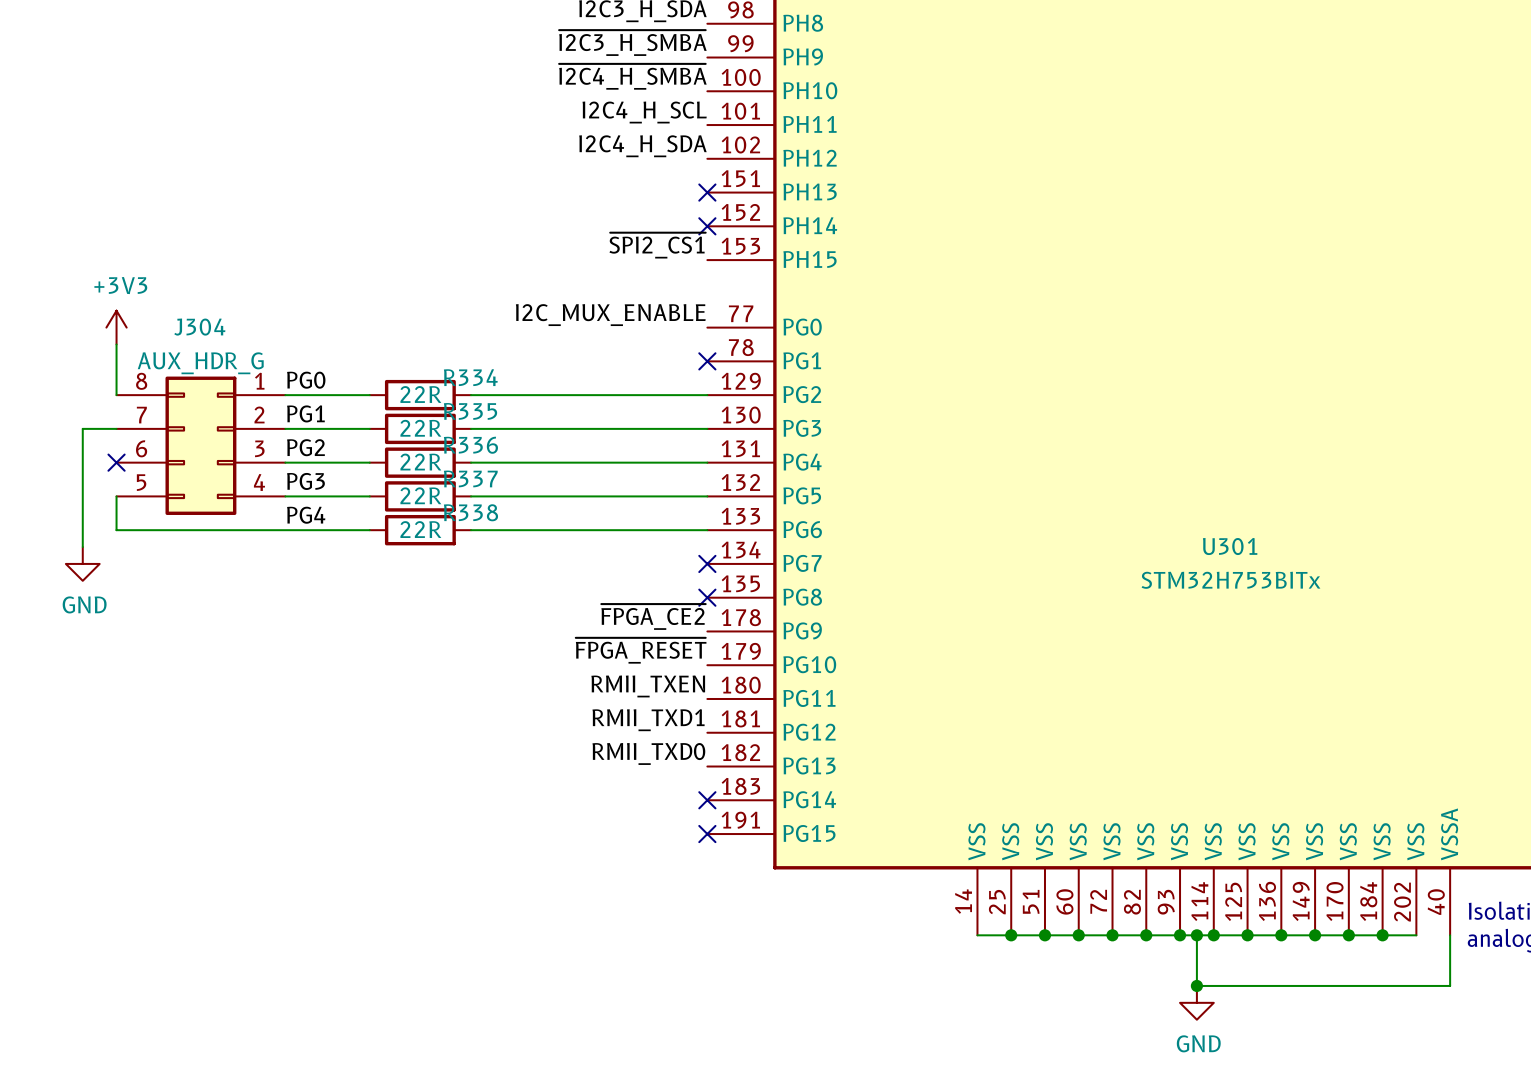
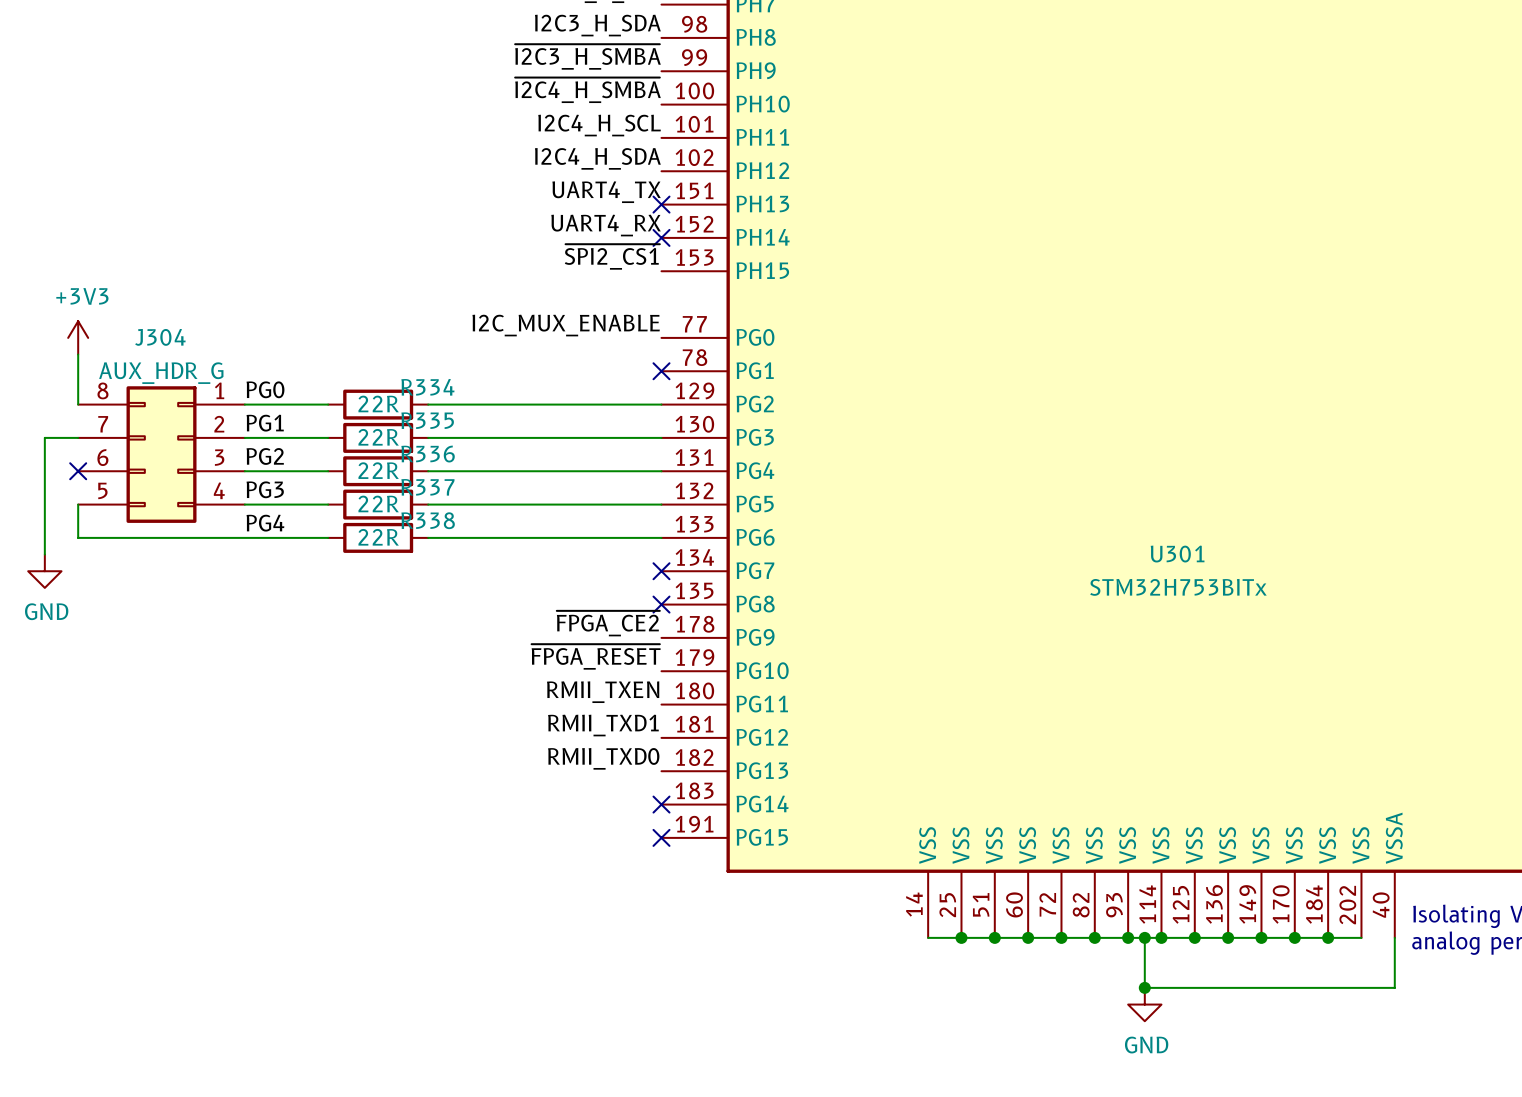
label: none -> UART4_TX (606, 192)
label: none -> UART4_RX (606, 225)

